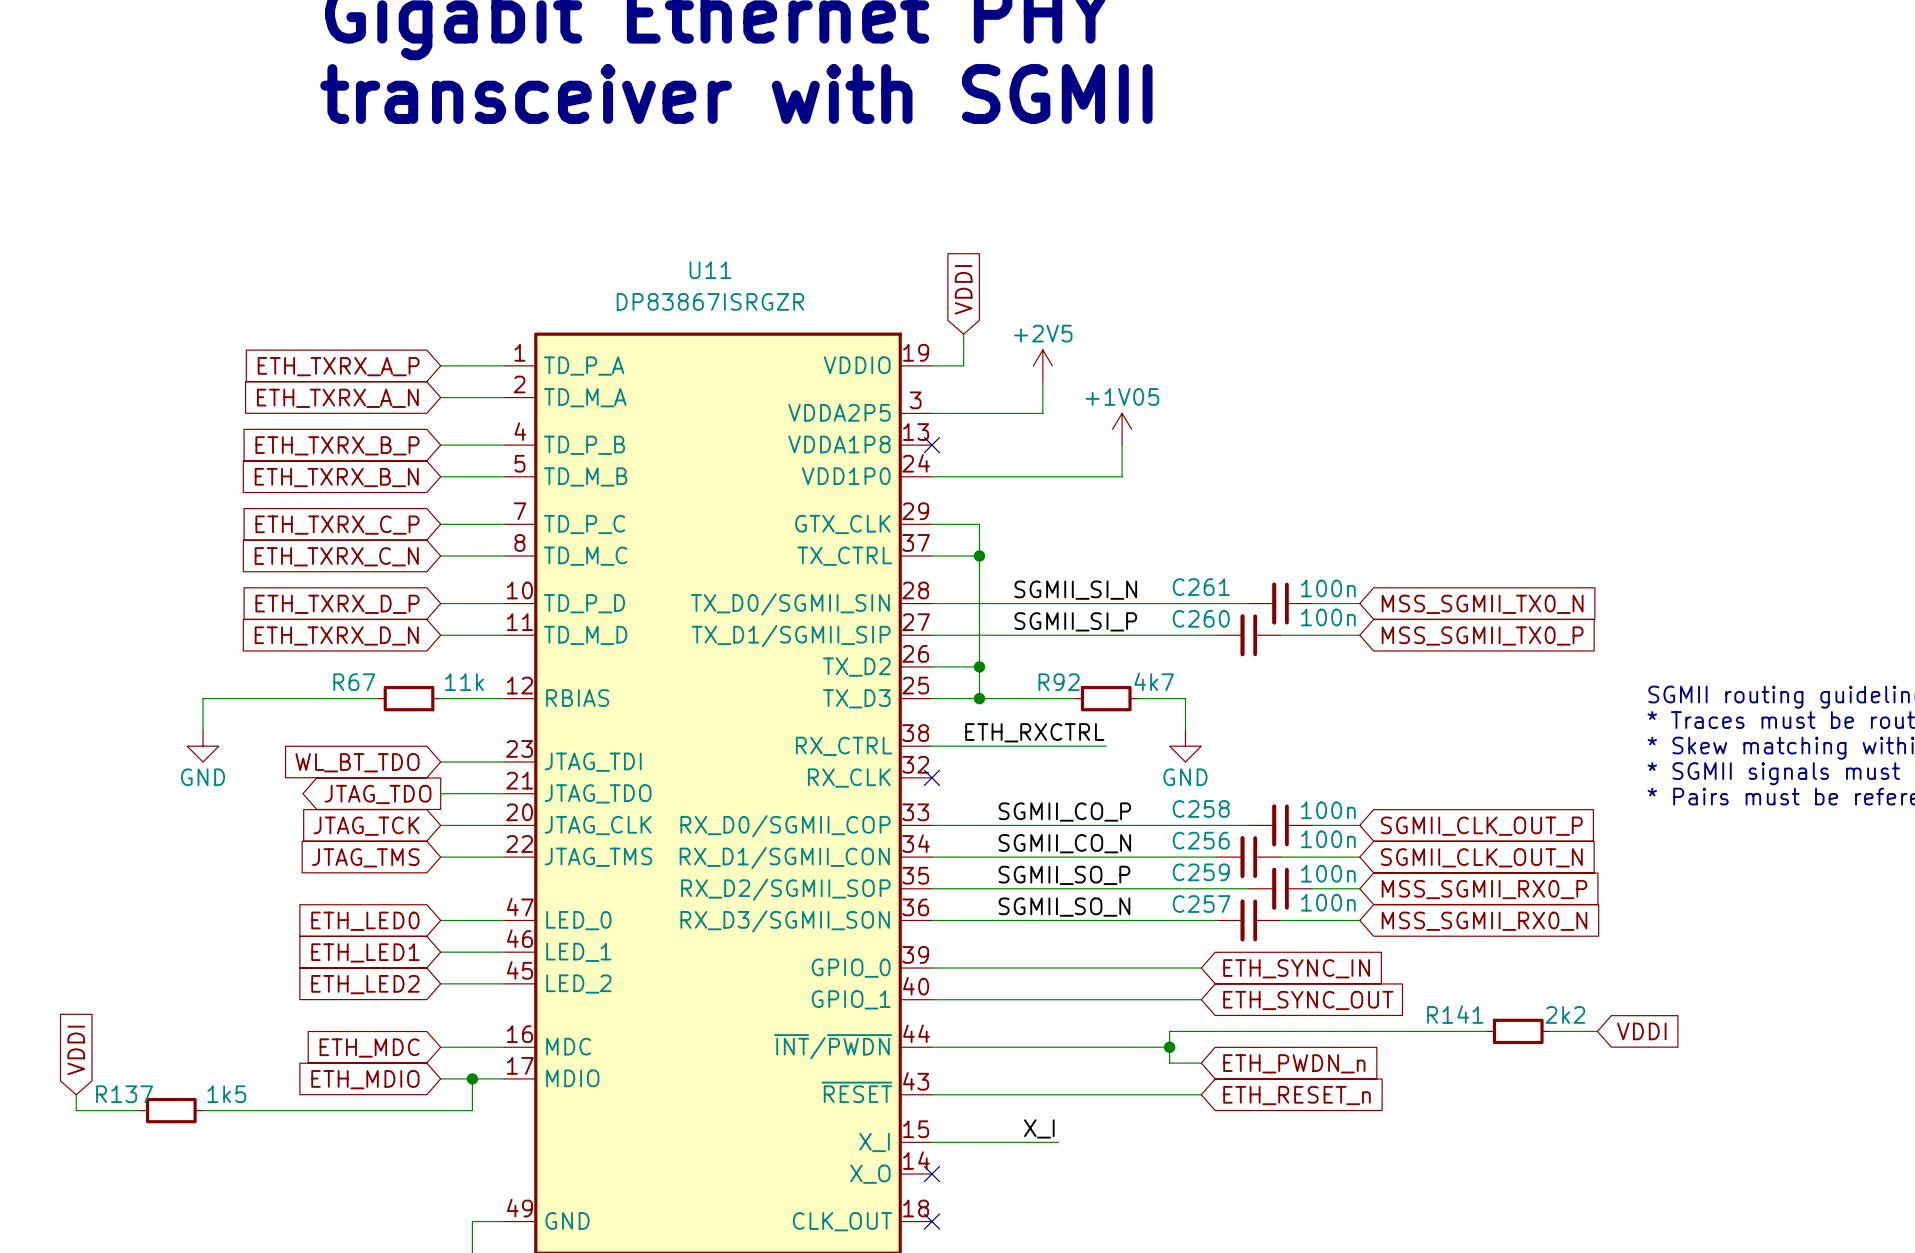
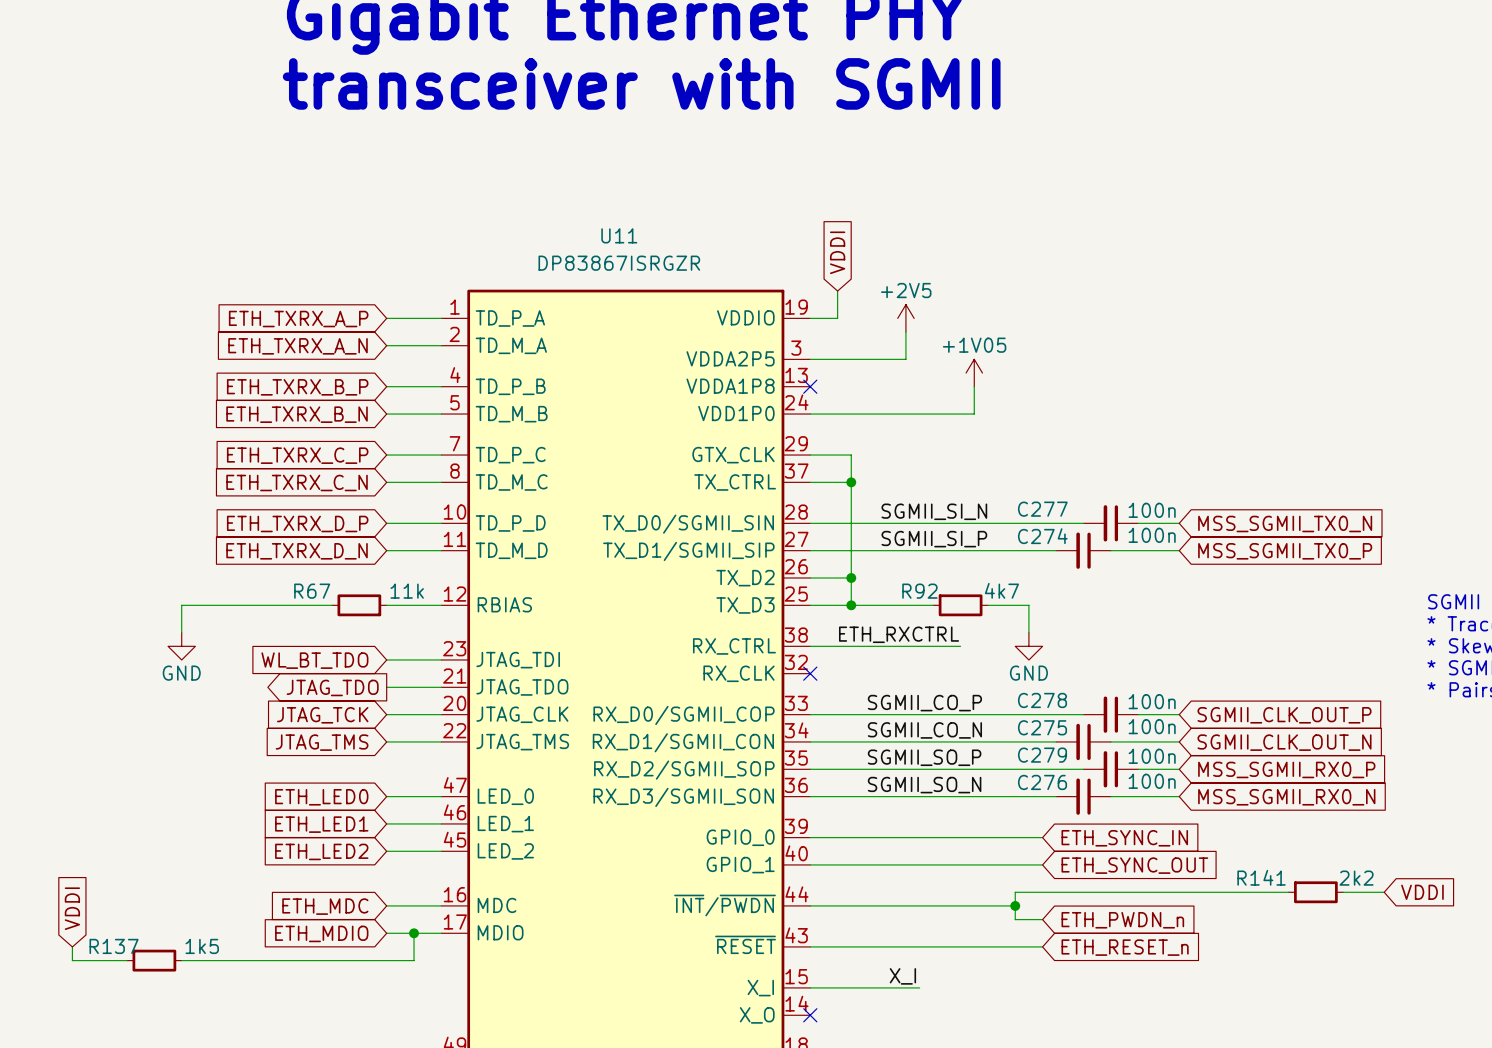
C261 name: C261 (1201, 587) -> C277 (1042, 509)
C260 name: C260 (1201, 618) -> C274 (1042, 536)
C258 name: C258 (1201, 808) -> C278 (1042, 700)
C256 name: C256 (1201, 840) -> C275 (1042, 727)
C259 name: C259 (1201, 872) -> C279 (1042, 755)
C257 name: C257 (1201, 904) -> C276 (1042, 782)

